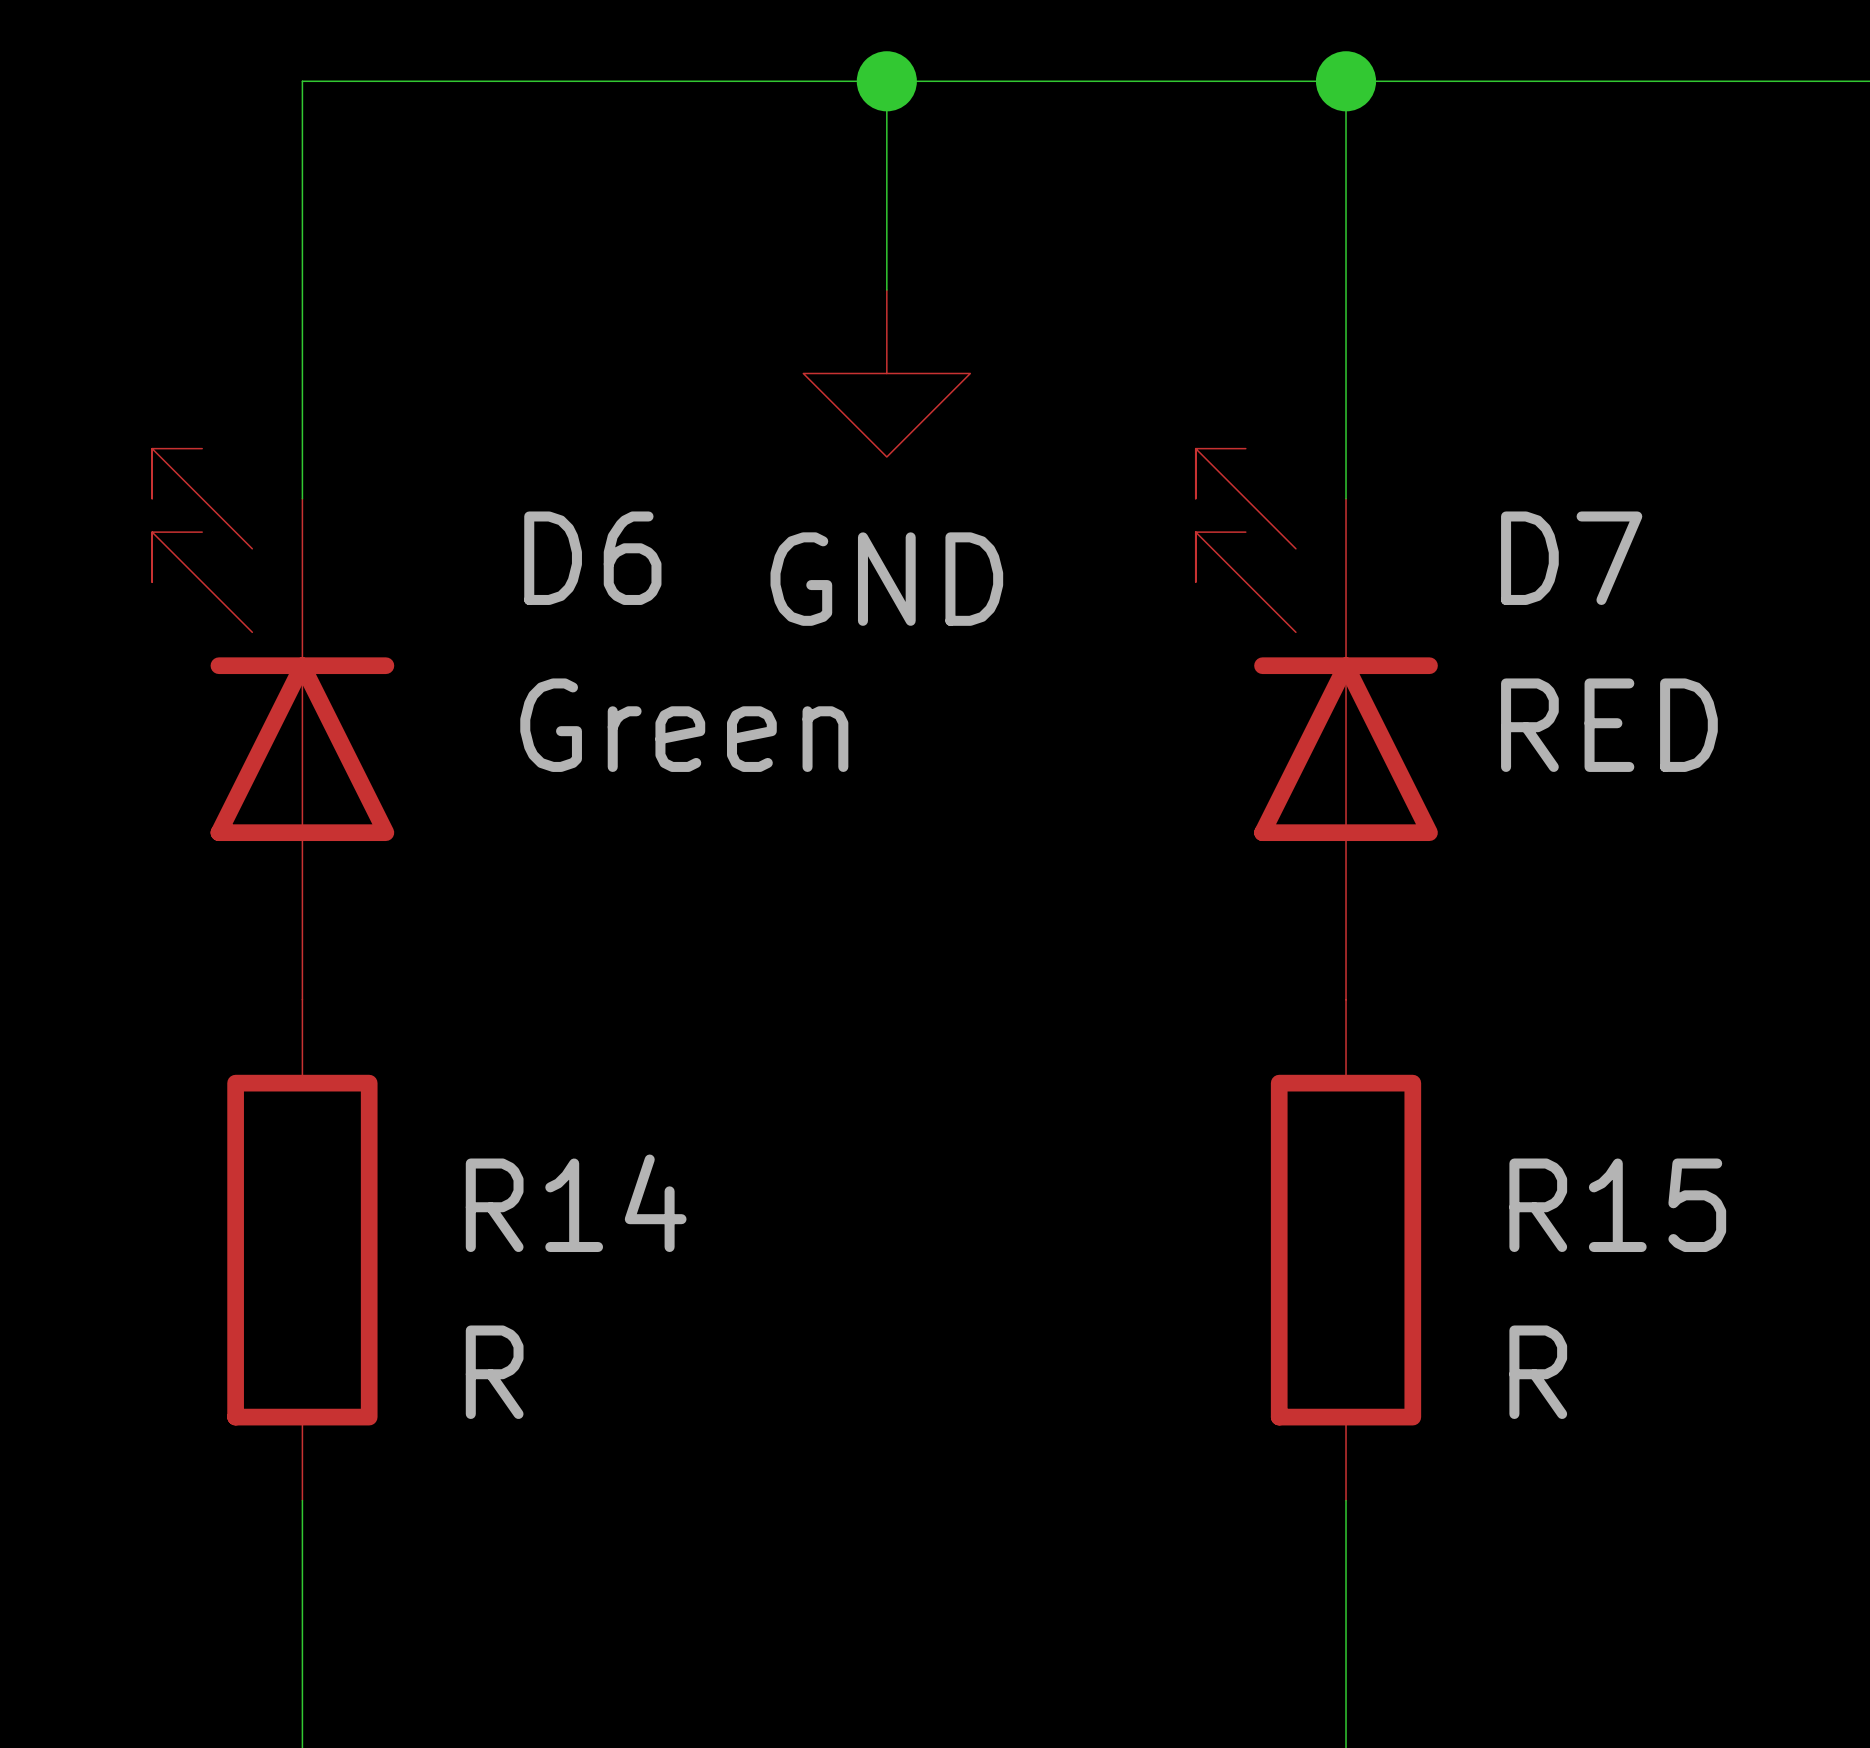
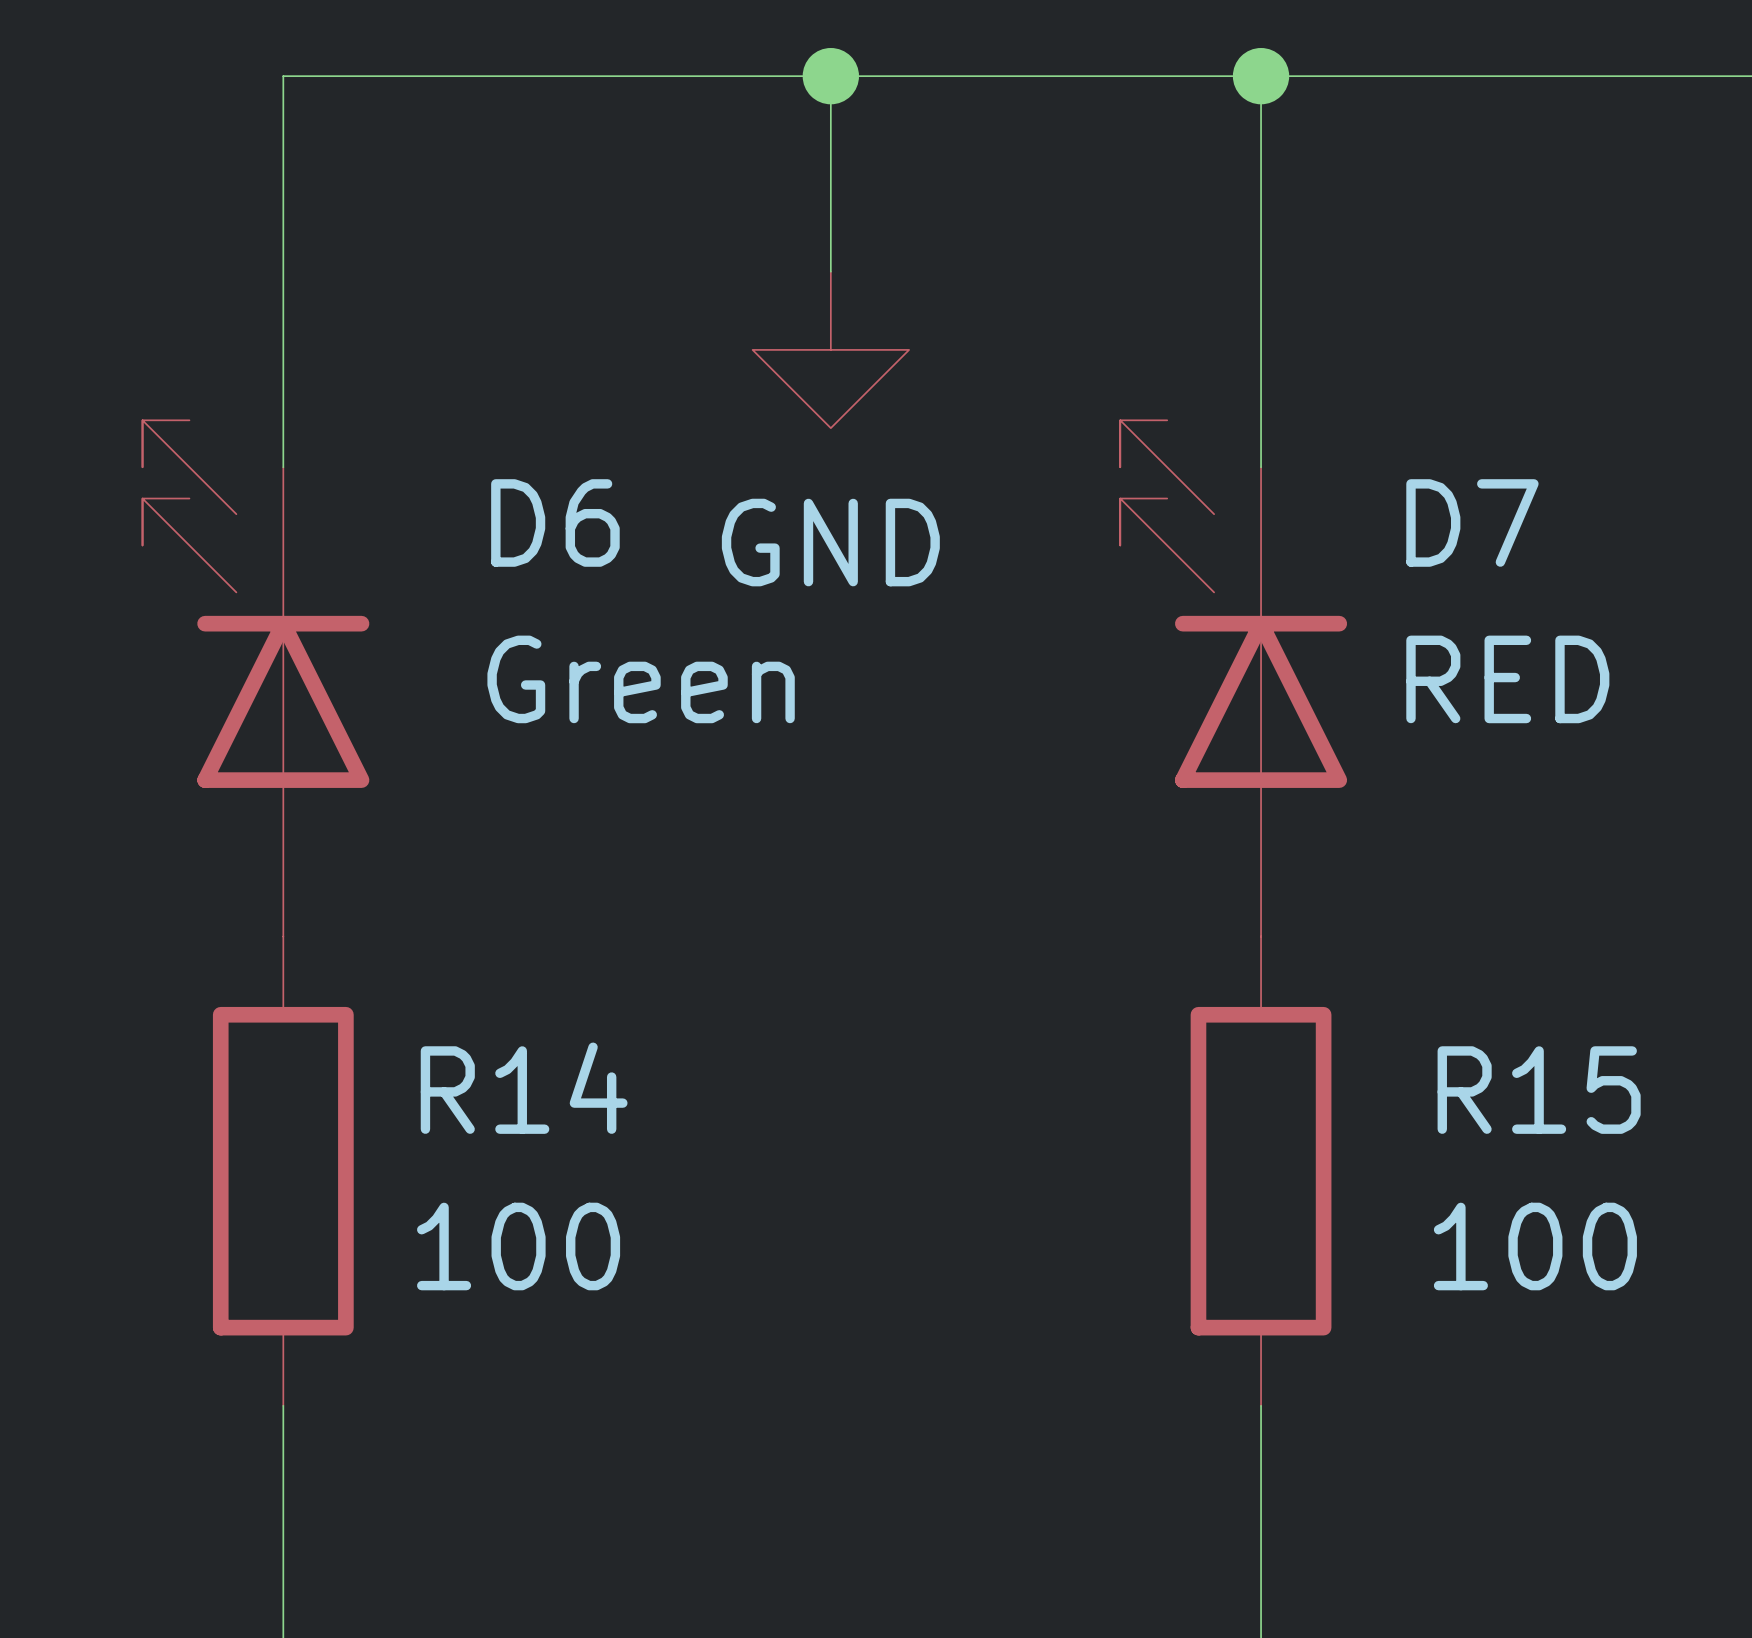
R14 name position: R14 (576, 1203) -> R14 (524, 1088)
R15 name position: R15 (1617, 1205) -> R15 (1539, 1090)
R14 value: R (494, 1372) -> 100 (518, 1246)
R15 value: R (1538, 1372) -> 100 (1535, 1246)

